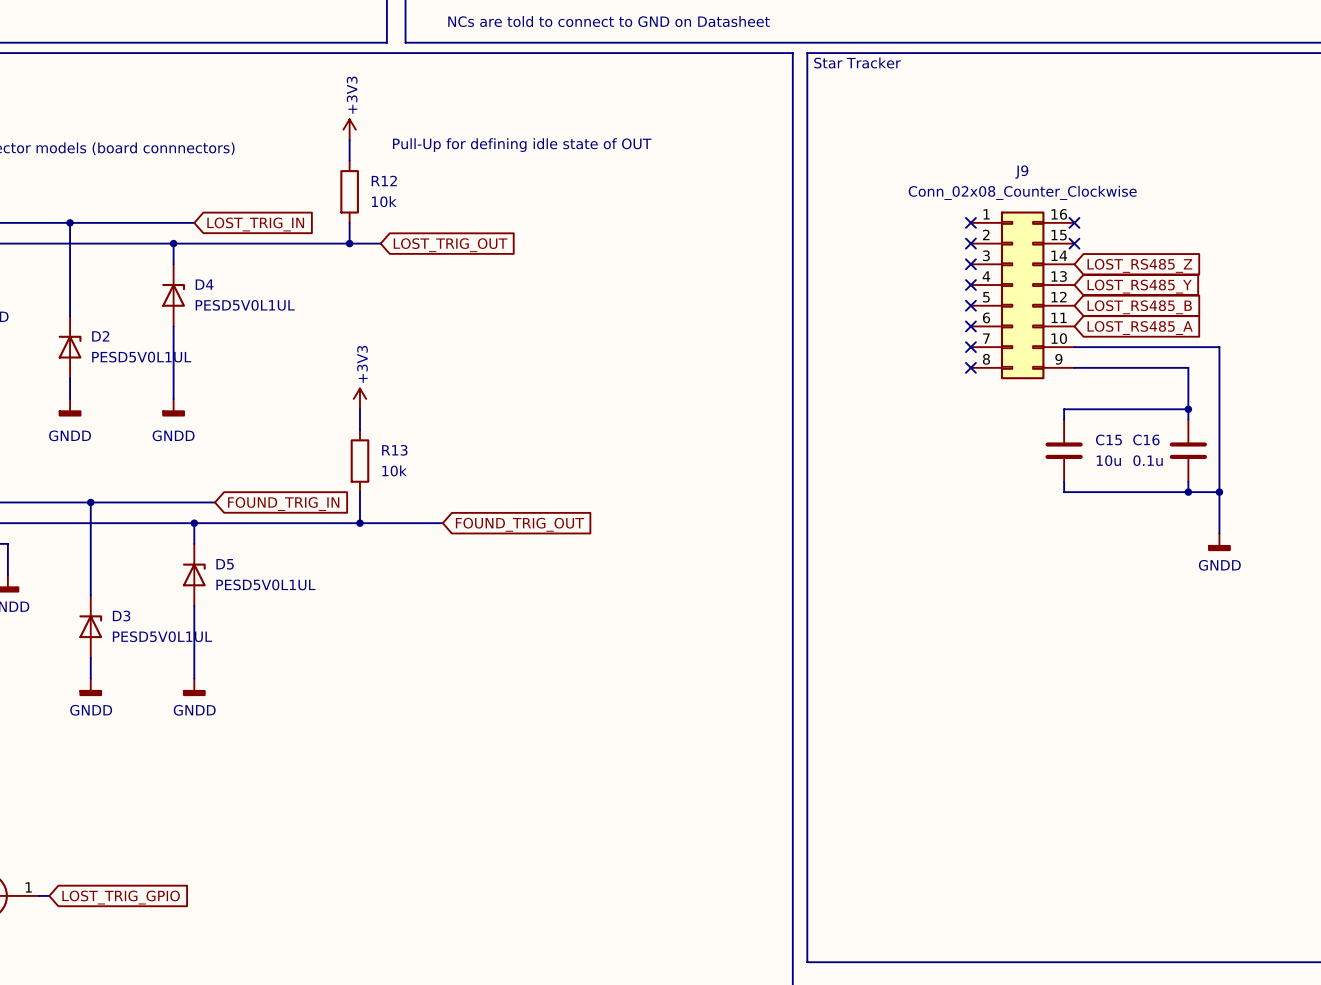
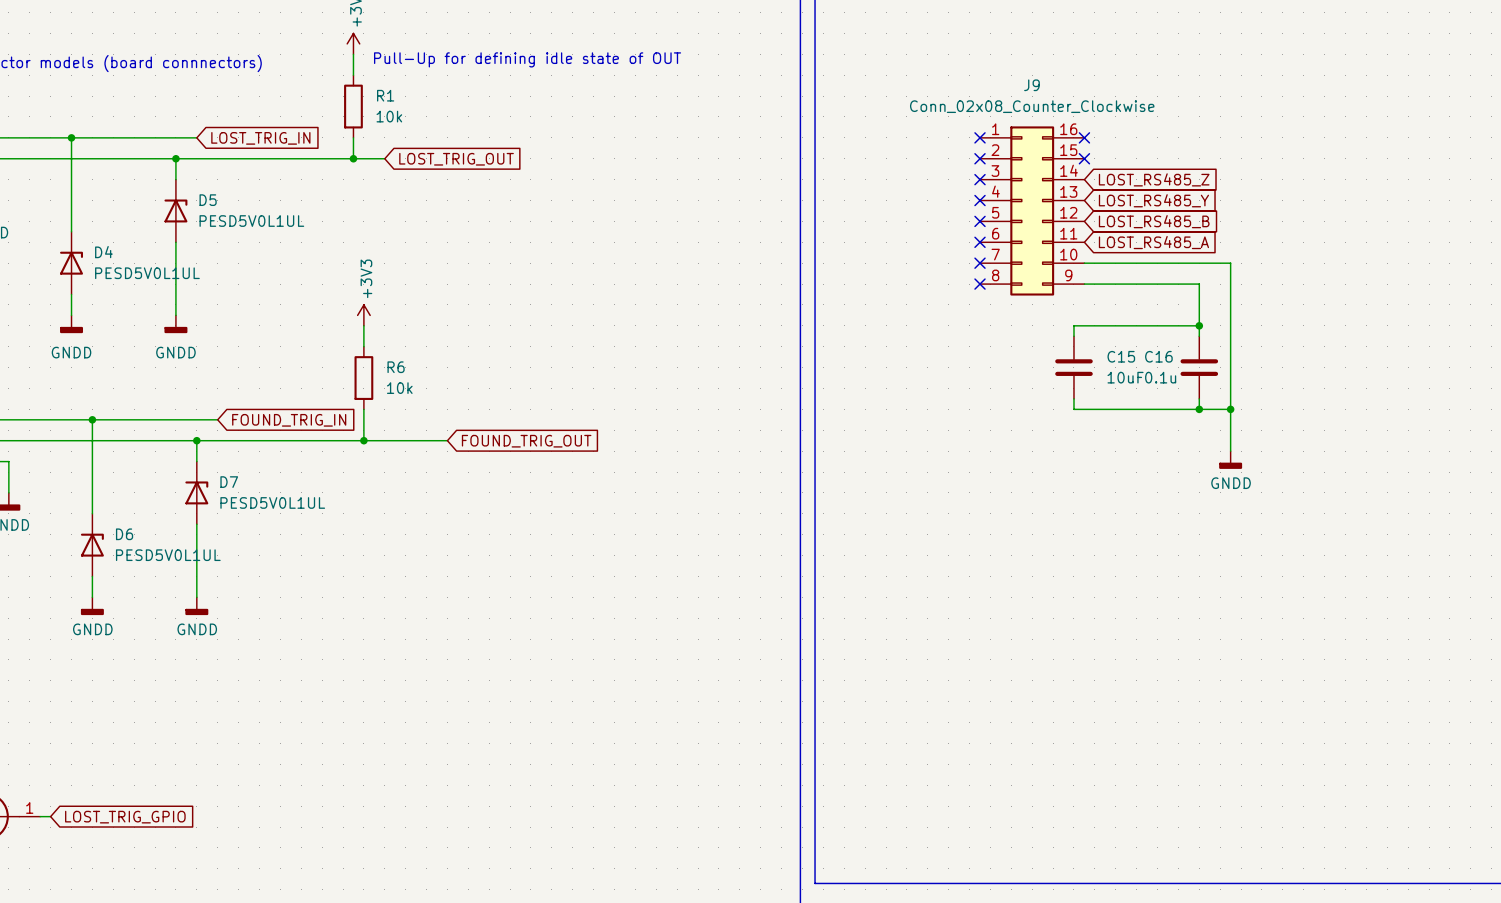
R12 name: R12 (384, 180) -> R1 (385, 95)
D4 name: D4 (204, 284) -> D5 (208, 200)
D2 name: D2 (100, 336) -> D4 (103, 252)
R13 name: R13 (394, 450) -> R6 (396, 367)
C15 value: 10u (1108, 460) -> 10uF (1125, 377)
D5 name: D5 (225, 564) -> D7 (229, 482)
D3 name: D3 (121, 615) -> D6 (124, 534)

